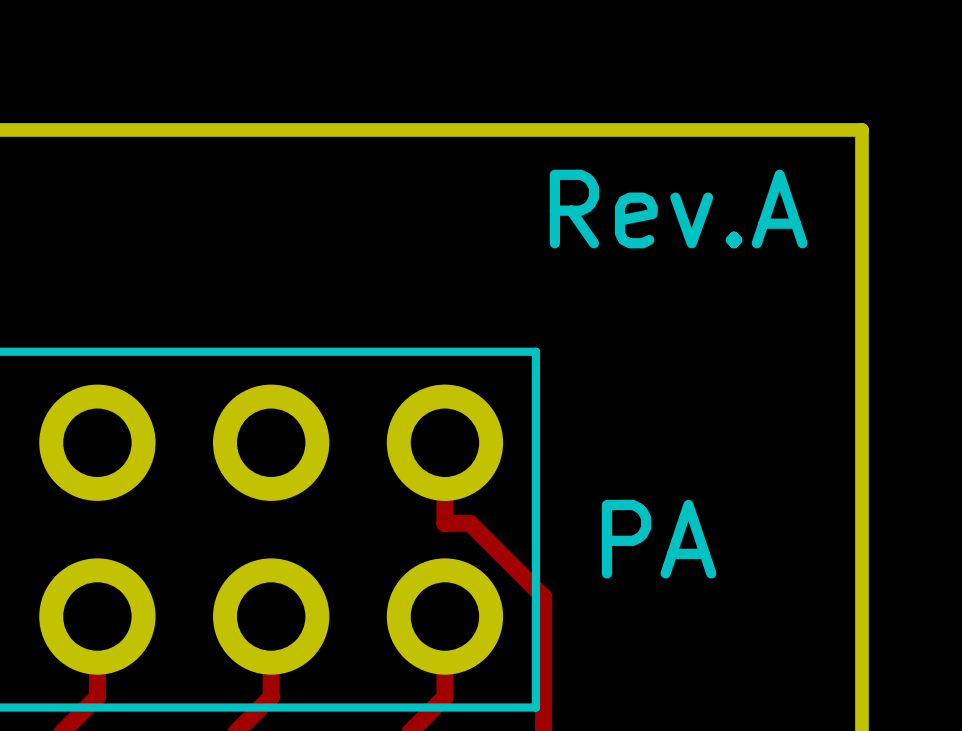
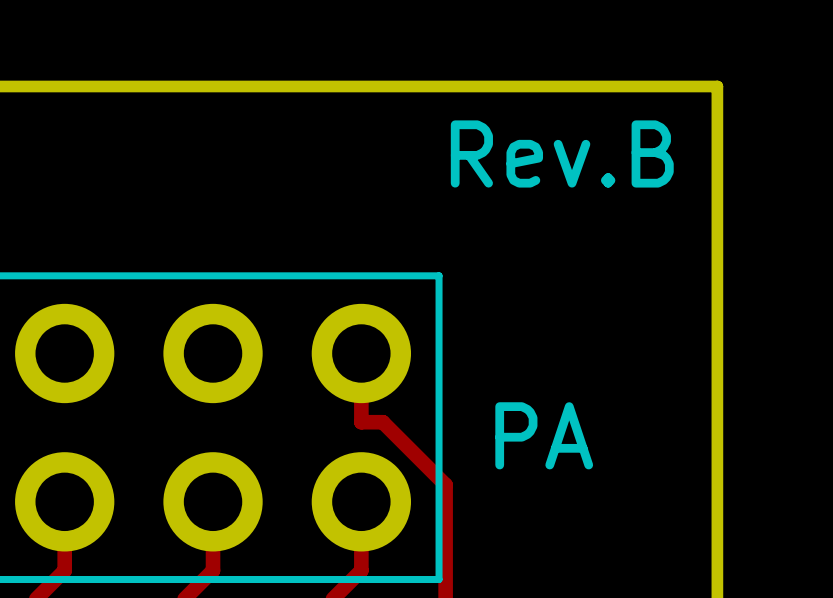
text: Rev.A (678, 209) -> Rev.B (562, 153)

